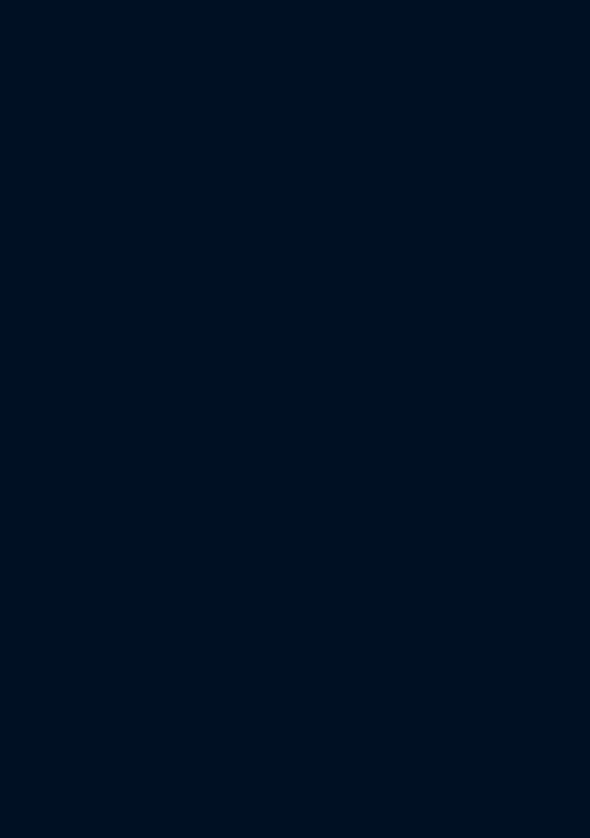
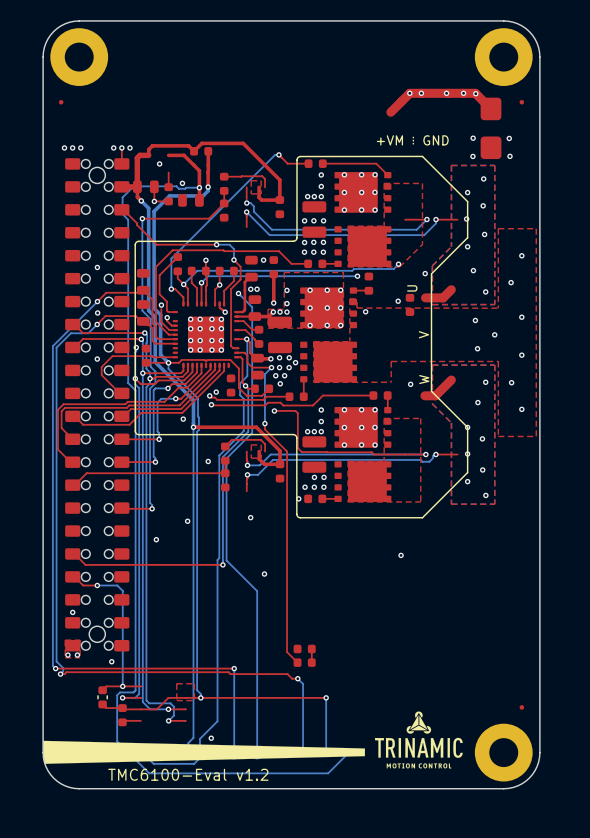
board edge: none -> (79, 20) (503, 20) (521, 25) (535, 39) (539, 57) (539, 752) (535, 770) (521, 783) (503, 788) (79, 788) (61, 783) (47, 770) (43, 752) (43, 57) (45, 43) (53, 31) (65, 23) (79, 20)
part: none -> (79, 57)
part: none -> (503, 57)
via: none -> (409, 93)
via: none -> (421, 93)
via: none -> (446, 93)
via: none -> (463, 93)
via: none -> (475, 93)
part: none -> (61, 102)
part: none -> (521, 102)
top track: none -> (491, 108) (475, 93) (409, 93) (390, 112)
part: none -> (491, 128)
via: none -> (473, 138)
via: none -> (509, 138)
text: none -> +VM ⁝ GND (412, 140)
via: none -> (64, 147)
via: none -> (72, 147)
via: none -> (80, 147)
via: none -> (113, 147)
top track: none -> (121, 147) (121, 163)
via: none -> (121, 147)
via: none -> (129, 147)
part: none -> (201, 151)
top track: none -> (208, 151) (208, 187)
top track: none -> (278, 154) (287, 163) (308, 163)
bottom track: none -> (278, 154) (275, 154) (171, 258) (171, 289)
via: none -> (278, 154)
top track: none -> (168, 155) (184, 155) (199, 170) (199, 200) (199, 187)
line: none -> (422, 156) (467, 201) (467, 237) (431, 273) (431, 391) (467, 427) (467, 472) (422, 517) (298, 517) (296, 514) (296, 438) (294, 434) (136, 433) (136, 242) (294, 241) (297, 237) (297, 160) (298, 157) (422, 156)
via: none -> (472, 156)
via: none -> (509, 156)
via: none -> (159, 163)
part: none -> (315, 163)
top track: none -> (322, 163) (376, 163) (387, 175)
top zone outline: none -> (451, 165) (451, 246) (432, 265) (432, 304) (494, 304) (494, 165) (451, 165)
top track: none -> (168, 172) (168, 187)
via: none -> (321, 174)
via: none -> (344, 174)
via: none -> (361, 174)
via: none -> (375, 174)
top track: none -> (224, 176) (262, 176) (264, 178) (264, 187)
via: none -> (483, 178)
top zone outline: none -> (251, 180) (261, 180) (261, 193) (251, 193) (251, 180)
via: none -> (182, 183)
part: none -> (224, 183)
top zone outline: none -> (384, 183) (422, 183) (422, 244) (399, 266) (348, 266) (348, 226) (384, 226) (384, 183)
top track: none -> (121, 186) (134, 186) (137, 184) (137, 157) (139, 155) (148, 155) (148, 149) (152, 145) (188, 145) (194, 151) (201, 143) (243, 143) (279, 180) (279, 200)
top track: none -> (137, 186) (137, 197) (141, 200)
part: none -> (145, 186)
top track: none -> (154, 186) (154, 201) (168, 201)
via: none -> (321, 186)
bottom track: none -> (199, 187) (133, 186) (122, 197) (122, 214) (128, 219) (128, 383) (135, 390) (135, 690) (133, 692) (119, 692) (117, 695) (117, 741) (149, 773) (328, 773) (348, 752)
via: none -> (199, 187)
bottom track: none -> (208, 187) (208, 190) (203, 195) (169, 195) (154, 211) (154, 308) (160, 314) (160, 354) (168, 362) (168, 368) (198, 398) (197, 690) (200, 694) (200, 697)
via: none -> (208, 187)
top track: none -> (246, 187) (246, 199)
top track: none -> (259, 187) (259, 197) (261, 200) (279, 200)
top track: none -> (224, 190) (224, 203) (208, 218) (142, 218)
via: none -> (344, 192)
via: none -> (361, 192)
part: none -> (362, 192)
via: none -> (374, 192)
via: none -> (467, 192)
part: none -> (168, 194)
via: none -> (307, 196)
via: none -> (314, 196)
via: none -> (321, 196)
bottom track: none -> (141, 200) (148, 208) (148, 310) (155, 317) (155, 362) (193, 400) (193, 737) (188, 743) (188, 752)
via: none -> (141, 200)
part: none -> (190, 200)
via: none -> (154, 201)
bottom track: none -> (246, 203) (250, 203) (253, 206) (253, 211) (271, 229) (416, 229) (426, 219)
via: none -> (246, 203)
via: none -> (483, 205)
part: none -> (279, 207)
top track: none -> (121, 209) (156, 244) (216, 244)
via: none -> (361, 209)
part: none -> (224, 210)
via: none -> (344, 210)
via: none -> (375, 210)
top track: none -> (246, 212) (246, 227)
bottom track: none -> (246, 212) (269, 235) (424, 235) (436, 223) (436, 219)
via: none -> (246, 212)
bottom track: none -> (142, 218) (142, 310) (150, 319) (150, 366) (155, 371) (155, 383) (150, 388) (150, 502) (152, 508)
via: none -> (142, 218)
part: none -> (314, 219)
top track: none -> (426, 219) (405, 219)
via: none -> (426, 219)
top track: none -> (436, 219) (457, 219)
via: none -> (436, 219)
via: none -> (466, 219)
via: none -> (304, 220)
via: none -> (313, 220)
via: none -> (323, 220)
top zone outline: none -> (498, 228) (498, 308) (356, 308) (357, 298) (349, 298) (349, 341) (313, 341) (313, 382) (391, 382) (391, 361) (498, 361) (498, 436) (536, 436) (536, 228) (498, 228)
via: none -> (484, 234)
via: none -> (304, 242)
via: none -> (313, 242)
via: none -> (323, 242)
bottom track: none -> (216, 244) (229, 244) (233, 249) (233, 259)
via: none -> (216, 244)
part: none -> (362, 246)
via: none -> (467, 246)
via: none -> (304, 252)
via: none -> (313, 252)
via: none -> (323, 252)
via: none -> (521, 255)
top track: none -> (177, 257) (159, 275) (159, 294) (166, 301) (166, 310) (175, 312)
via: none -> (233, 259)
top track: none -> (205, 260) (205, 290)
via: none -> (205, 260)
top track: none -> (233, 260) (240, 266) (240, 279) (231, 289) (231, 346) (236, 348)
via: none -> (263, 260)
top track: none -> (308, 263) (291, 263) (278, 251) (172, 250) (156, 266) (156, 321) (168, 334) (175, 334)
part: none -> (315, 263)
top track: none -> (322, 263) (338, 263)
part: none -> (177, 264)
bottom track: none -> (398, 264) (393, 268) (354, 268) (352, 270) (197, 270) (183, 284)
via: none -> (398, 264)
via: none -> (97, 267)
part: none -> (273, 267)
part: none -> (251, 268)
top track: none -> (191, 270) (191, 282) (197, 288) (197, 303)
part: none -> (198, 270)
top track: none -> (219, 270) (219, 284) (215, 289) (215, 303)
part: none -> (226, 270)
top track: none -> (233, 270) (233, 281) (224, 290) (224, 303)
via: none -> (473, 270)
top track: none -> (177, 271) (177, 278) (187, 288) (187, 303)
top zone outline: none -> (284, 272) (343, 272) (343, 328) (268, 328) (268, 309) (284, 309) (284, 272)
via: none -> (425, 273)
top track: none -> (273, 274) (273, 302)
bottom track: none -> (357, 276) (208, 276) (201, 282)
via: none -> (357, 276)
top track: none -> (250, 277) (244, 282) (244, 310) (236, 312)
part: none -> (143, 281)
top track: none -> (201, 282) (201, 303)
via: none -> (201, 282)
via: none -> (511, 282)
part: none -> (368, 283)
via: none -> (183, 284)
via: none -> (219, 284)
text: none -> U (412, 288)
top track: none -> (171, 289) (175, 289) (183, 297) (183, 303)
via: none -> (171, 289)
via: none -> (250, 289)
via: none -> (257, 289)
top track: none -> (451, 289) (443, 297) (425, 297)
top track: none -> (206, 290) (206, 303)
via: none -> (286, 290)
via: none -> (310, 290)
via: none -> (327, 290)
via: none -> (340, 290)
top track: none -> (353, 290) (369, 290)
via: none -> (485, 291)
bottom track: none -> (238, 293) (252, 307) (252, 432) (226, 458) (226, 560) (257, 591) (257, 752)
via: none -> (238, 293)
top track: none -> (97, 301) (106, 292) (138, 292) (143, 290) (152, 299) (152, 323) (156, 327) (156, 336) (158, 339) (175, 339)
bottom track: none -> (97, 301) (52, 346) (52, 665) (55, 668)
via: none -> (97, 301)
via: none -> (398, 301)
top track: none -> (219, 303) (219, 307) (225, 312)
via: none -> (273, 303)
via: none -> (286, 303)
part: none -> (410, 304)
via: none -> (161, 305)
via: none -> (310, 307)
via: none -> (327, 307)
part: none -> (328, 307)
via: none -> (340, 307)
part: none -> (254, 308)
top track: none -> (161, 309) (161, 322) (169, 330) (175, 330)
via: none -> (365, 311)
via: none -> (97, 312)
part: none -> (143, 312)
via: none -> (225, 312)
top track: none -> (273, 312) (268, 316) (236, 316)
via: none -> (273, 312)
via: none -> (280, 312)
via: none -> (286, 312)
top track: none -> (167, 317) (167, 321) (171, 325) (175, 325)
via: none -> (167, 317)
via: none -> (521, 317)
via: none -> (190, 319)
via: none -> (200, 319)
via: none -> (211, 319)
via: none -> (221, 319)
via: none -> (475, 320)
top track: none -> (236, 321) (243, 321) (252, 329) (259, 329)
top track: none -> (72, 324) (82, 333) (140, 333)
top track: none -> (97, 324) (105, 316) (135, 316) (152, 328) (152, 340) (155, 343) (175, 343)
bottom track: none -> (97, 324) (88, 333) (70, 333) (56, 347) (56, 661) (63, 668) (60, 674)
via: none -> (97, 324)
via: none -> (310, 325)
via: none -> (327, 325)
via: none -> (340, 325)
via: none -> (190, 328)
via: none -> (200, 328)
via: none -> (211, 328)
via: none -> (221, 328)
top track: none -> (236, 330) (245, 330) (259, 343)
bottom track: none -> (144, 332) (147, 335) (146, 368) (150, 372) (150, 383) (146, 387) (146, 700) (149, 703) (170, 703) (173, 706) (173, 715) (168, 720)
via: none -> (144, 332)
part: none -> (206, 334)
part: none -> (280, 334)
text: none -> V (423, 334)
via: none -> (494, 334)
part: none -> (259, 336)
top track: none -> (141, 339) (83, 339) (72, 347)
bottom track: none -> (141, 339) (142, 340) (142, 702) (150, 709) (168, 709)
via: none -> (141, 339)
top track: none -> (236, 339) (246, 339) (250, 342) (250, 352) (258, 358) (270, 358)
bottom track: none -> (246, 339) (247, 376) (240, 383) (240, 395) (243, 398) (243, 431) (219, 455) (217, 721) (199, 738) (199, 758) (194, 763) (153, 763) (142, 752)
via: none -> (246, 339)
via: none -> (190, 340)
via: none -> (200, 340)
via: none -> (211, 340)
via: none -> (221, 340)
bottom track: none -> (136, 347) (135, 384) (139, 388) (139, 693) (135, 697) (122, 697)
via: none -> (136, 347)
via: none -> (477, 348)
via: none -> (190, 350)
via: none -> (200, 350)
via: none -> (211, 350)
via: none -> (221, 350)
top track: none -> (236, 352) (244, 352) (247, 355) (247, 362) (252, 367) (271, 367)
part: none -> (146, 355)
via: none -> (521, 355)
top track: none -> (175, 357) (112, 356) (101, 367) (101, 375) (121, 393)
top track: none -> (236, 357) (242, 359) (242, 382) (248, 388) (254, 388)
via: none -> (279, 357)
via: none -> (289, 357)
via: none -> (270, 358)
via: none -> (97, 359)
top track: none -> (146, 362) (178, 362) (181, 359) (230, 359) (238, 368) (238, 387) (246, 395) (262, 395) (269, 388)
via: none -> (168, 362)
via: none -> (295, 362)
part: none -> (328, 362)
top track: none -> (183, 365) (183, 370) (181, 373) (142, 373)
top track: none -> (187, 365) (187, 371) (182, 376) (150, 378)
top track: none -> (192, 365) (192, 372) (184, 380) (158, 380) (155, 383) (140, 384) (135, 378)
top track: none -> (197, 365) (197, 372) (185, 384) (172, 384) (168, 388)
top track: none -> (201, 365) (201, 373) (187, 387) (178, 387) (164, 401) (63, 404) (58, 409) (58, 449) (72, 462)
top track: none -> (210, 365) (210, 369) (181, 398) (175, 398)
top track: none -> (215, 365) (215, 369) (179, 405) (65, 407) (61, 411) (61, 428) (72, 439)
top track: none -> (219, 365) (219, 370) (181, 409) (130, 409) (121, 416)
top track: none -> (224, 365) (224, 371) (182, 412) (141, 412) (129, 424) (83, 424) (72, 416)
top zone outline: none -> (432, 365) (432, 403) (451, 422) (451, 504) (494, 504) (494, 365) (432, 365)
part: none -> (257, 366)
bottom track: none -> (271, 367) (264, 374) (264, 423)
via: none -> (271, 367)
via: none -> (279, 367)
via: none -> (289, 367)
via: none -> (142, 373)
via: none -> (275, 375)
via: none -> (284, 375)
via: none -> (135, 378)
via: none -> (150, 378)
top track: none -> (303, 379) (303, 396)
text: none -> W (424, 379)
top track: none -> (451, 380) (435, 395) (424, 395)
via: none -> (485, 382)
via: none -> (511, 382)
via: none -> (280, 383)
via: none -> (410, 384)
part: none -> (231, 385)
bottom track: none -> (245, 385) (248, 388) (248, 431) (222, 457) (222, 564)
via: none -> (245, 385)
bottom track: none -> (168, 388) (155, 388) (153, 390) (153, 456) (155, 462)
via: none -> (168, 388)
part: none -> (262, 388)
via: none -> (216, 392)
top track: none -> (209, 395) (217, 399) (263, 399) (266, 396) (289, 396)
via: none -> (209, 395)
top track: none -> (373, 395) (322, 395) (312, 405) (283, 405) (280, 402) (267, 402) (265, 405) (211, 404)
part: none -> (380, 395)
top track: none -> (387, 395) (387, 410)
part: none -> (296, 396)
bottom track: none -> (175, 398) (161, 398) (157, 402) (159, 439)
via: none -> (175, 398)
via: none -> (477, 402)
part: none -> (97, 404)
via: none -> (211, 404)
via: none -> (321, 409)
via: none -> (344, 409)
via: none -> (361, 409)
via: none -> (375, 409)
via: none -> (521, 409)
top track: none -> (274, 410) (295, 410) (297, 413) (297, 448) (301, 452) (371, 452)
via: none -> (274, 410)
top zone outline: none -> (384, 418) (384, 461) (348, 461) (348, 501) (420, 501) (420, 418) (384, 418)
via: none -> (183, 419)
via: none -> (321, 421)
top track: none -> (264, 423) (264, 429) (287, 451) (287, 652) (297, 662)
via: none -> (264, 423)
top track: none -> (193, 427) (256, 427) (280, 450) (280, 464) (264, 464) (259, 458) (259, 451)
via: none -> (193, 427)
via: none -> (344, 427)
via: none -> (361, 427)
part: none -> (362, 427)
via: none -> (374, 427)
via: none -> (467, 427)
via: none -> (307, 431)
via: none -> (314, 431)
via: none -> (321, 431)
via: none -> (482, 438)
top track: none -> (121, 439) (159, 439)
via: none -> (159, 439)
top zone outline: none -> (251, 444) (261, 444) (261, 458) (251, 458) (251, 444)
via: none -> (361, 444)
via: none -> (344, 445)
via: none -> (375, 445)
top track: none -> (225, 446) (231, 439) (260, 439) (265, 444) (265, 451)
top track: none -> (246, 451) (247, 465)
top track: none -> (371, 452) (373, 454) (425, 454)
part: none -> (225, 453)
via: none -> (467, 453)
part: none -> (314, 454)
bottom track: none -> (425, 454) (270, 454) (259, 465) (247, 465)
via: none -> (425, 454)
top track: none -> (435, 454) (457, 454)
bottom track: none -> (435, 454) (429, 461) (420, 459) (272, 459) (258, 474) (247, 474)
via: none -> (435, 454)
top track: none -> (225, 460) (225, 473) (86, 473) (72, 485)
via: none -> (208, 461)
top track: none -> (121, 462) (155, 462)
via: none -> (155, 462)
via: none -> (247, 465)
via: none -> (482, 469)
part: none -> (280, 471)
top track: none -> (247, 474) (246, 491)
via: none -> (247, 474)
via: none -> (314, 477)
via: none -> (324, 477)
part: none -> (225, 480)
part: none -> (362, 481)
via: none -> (467, 481)
via: none -> (305, 487)
via: none -> (314, 487)
via: none -> (323, 487)
via: none -> (485, 495)
via: none -> (298, 498)
part: none -> (315, 498)
top track: none -> (322, 498) (338, 498)
top track: none -> (121, 508) (152, 508)
via: none -> (152, 508)
via: none -> (250, 517)
via: none -> (187, 521)
via: none -> (156, 539)
top track: none -> (72, 553) (85, 564) (222, 564)
via: none -> (401, 555)
via: none -> (222, 564)
via: none -> (264, 574)
top track: none -> (72, 576) (83, 585) (97, 585)
bottom track: none -> (97, 585) (117, 585) (122, 590) (122, 686)
via: none -> (97, 585)
via: none -> (72, 612)
top zone outline: none -> (65, 640) (80, 640) (80, 657) (65, 657) (65, 640)
part: none -> (304, 648)
top track: none -> (311, 648) (311, 662)
via: none -> (67, 655)
via: none -> (77, 655)
via: none -> (111, 661)
part: none -> (304, 662)
top track: none -> (55, 668) (234, 668)
via: none -> (55, 668)
bottom track: none -> (234, 668) (234, 752)
via: none -> (234, 668)
top track: none -> (60, 674) (66, 672) (228, 672) (230, 674) (287, 674) (292, 678) (297, 678)
via: none -> (60, 674)
bottom track: none -> (297, 678) (303, 683) (303, 752)
via: none -> (297, 678)
top zone outline: none -> (176, 683) (176, 700) (194, 700) (194, 683) (176, 683)
via: none -> (122, 686)
top track: none -> (140, 686) (106, 686) (102, 690)
part: none -> (102, 697)
top track: none -> (122, 697) (140, 697)
via: none -> (122, 697)
via: none -> (200, 697)
top track: none -> (326, 697) (168, 697) (156, 709) (106, 708) (102, 704)
bottom track: none -> (326, 697) (325, 752)
via: none -> (326, 697)
part: none -> (521, 707)
top track: none -> (168, 709) (185, 709)
via: none -> (168, 709)
drawing: none -> [43, 711, 463, 769]
part: none -> (122, 715)
top track: none -> (140, 720) (122, 722)
top track: none -> (168, 720) (185, 720)
via: none -> (168, 720)
via: none -> (211, 738)
part: none -> (503, 752)
text: none -> TMC6100-Eval v1.2 (188, 774)

